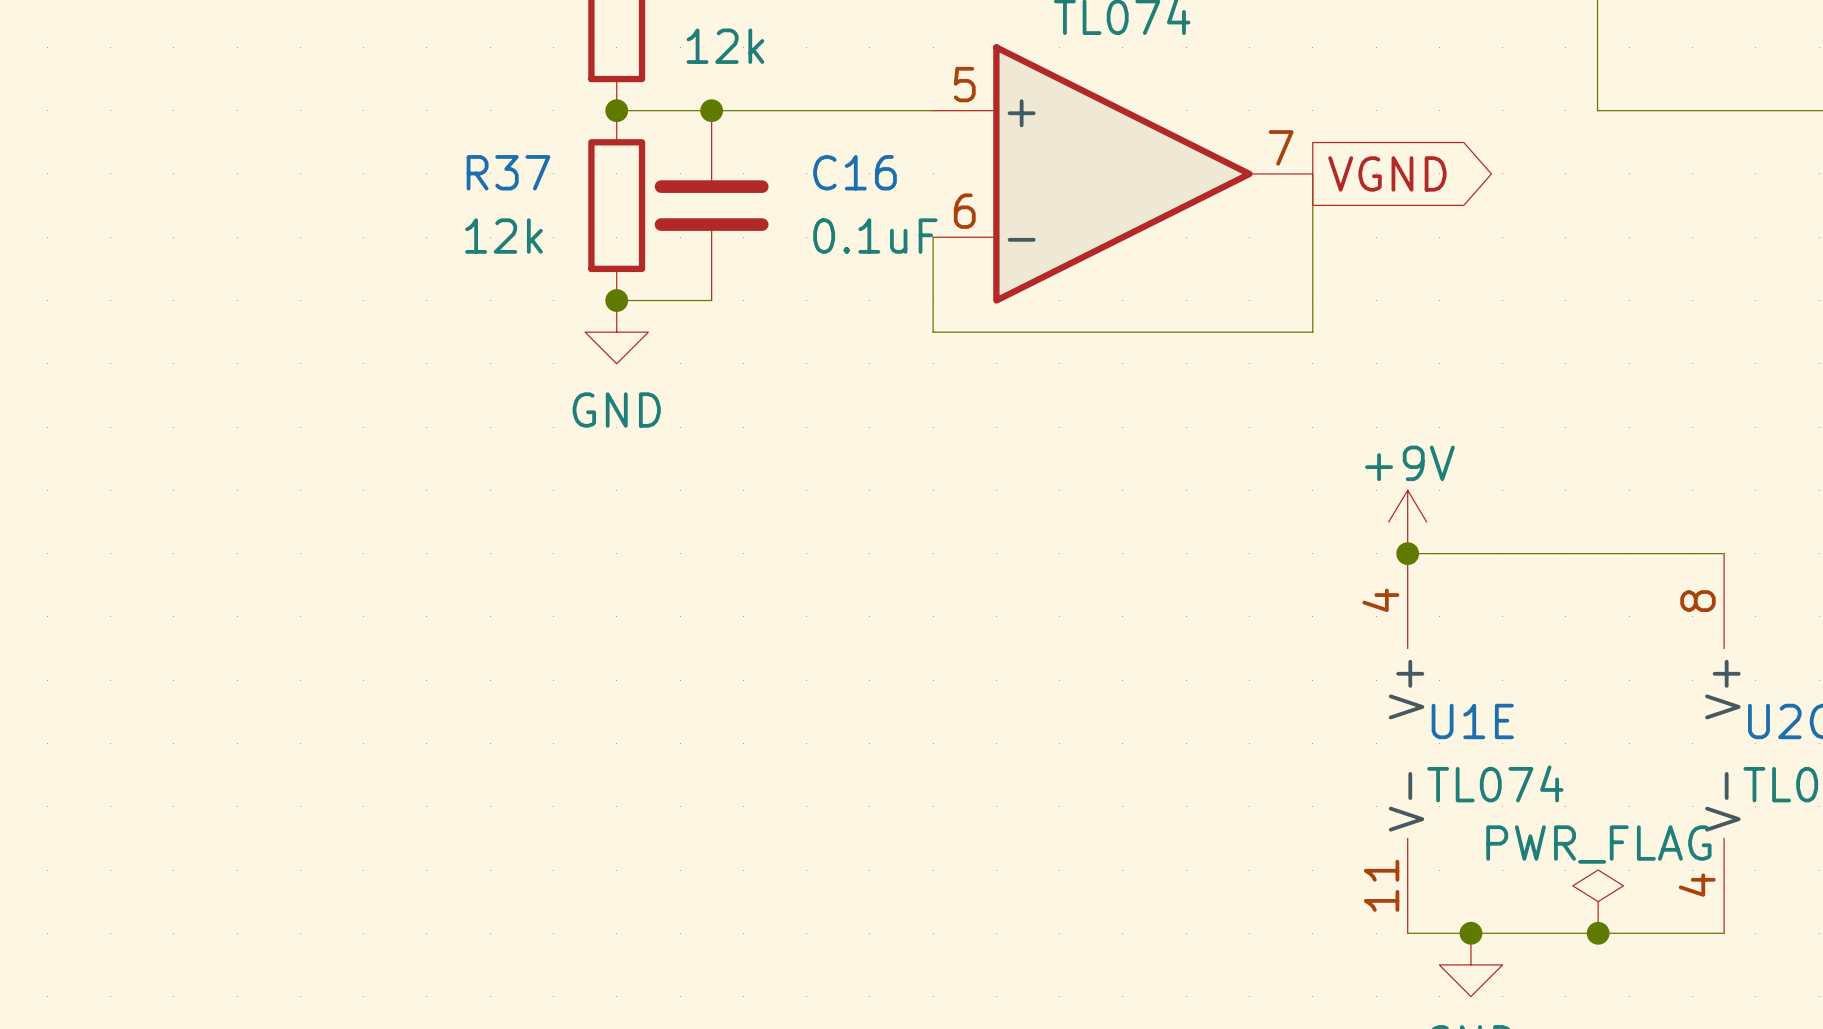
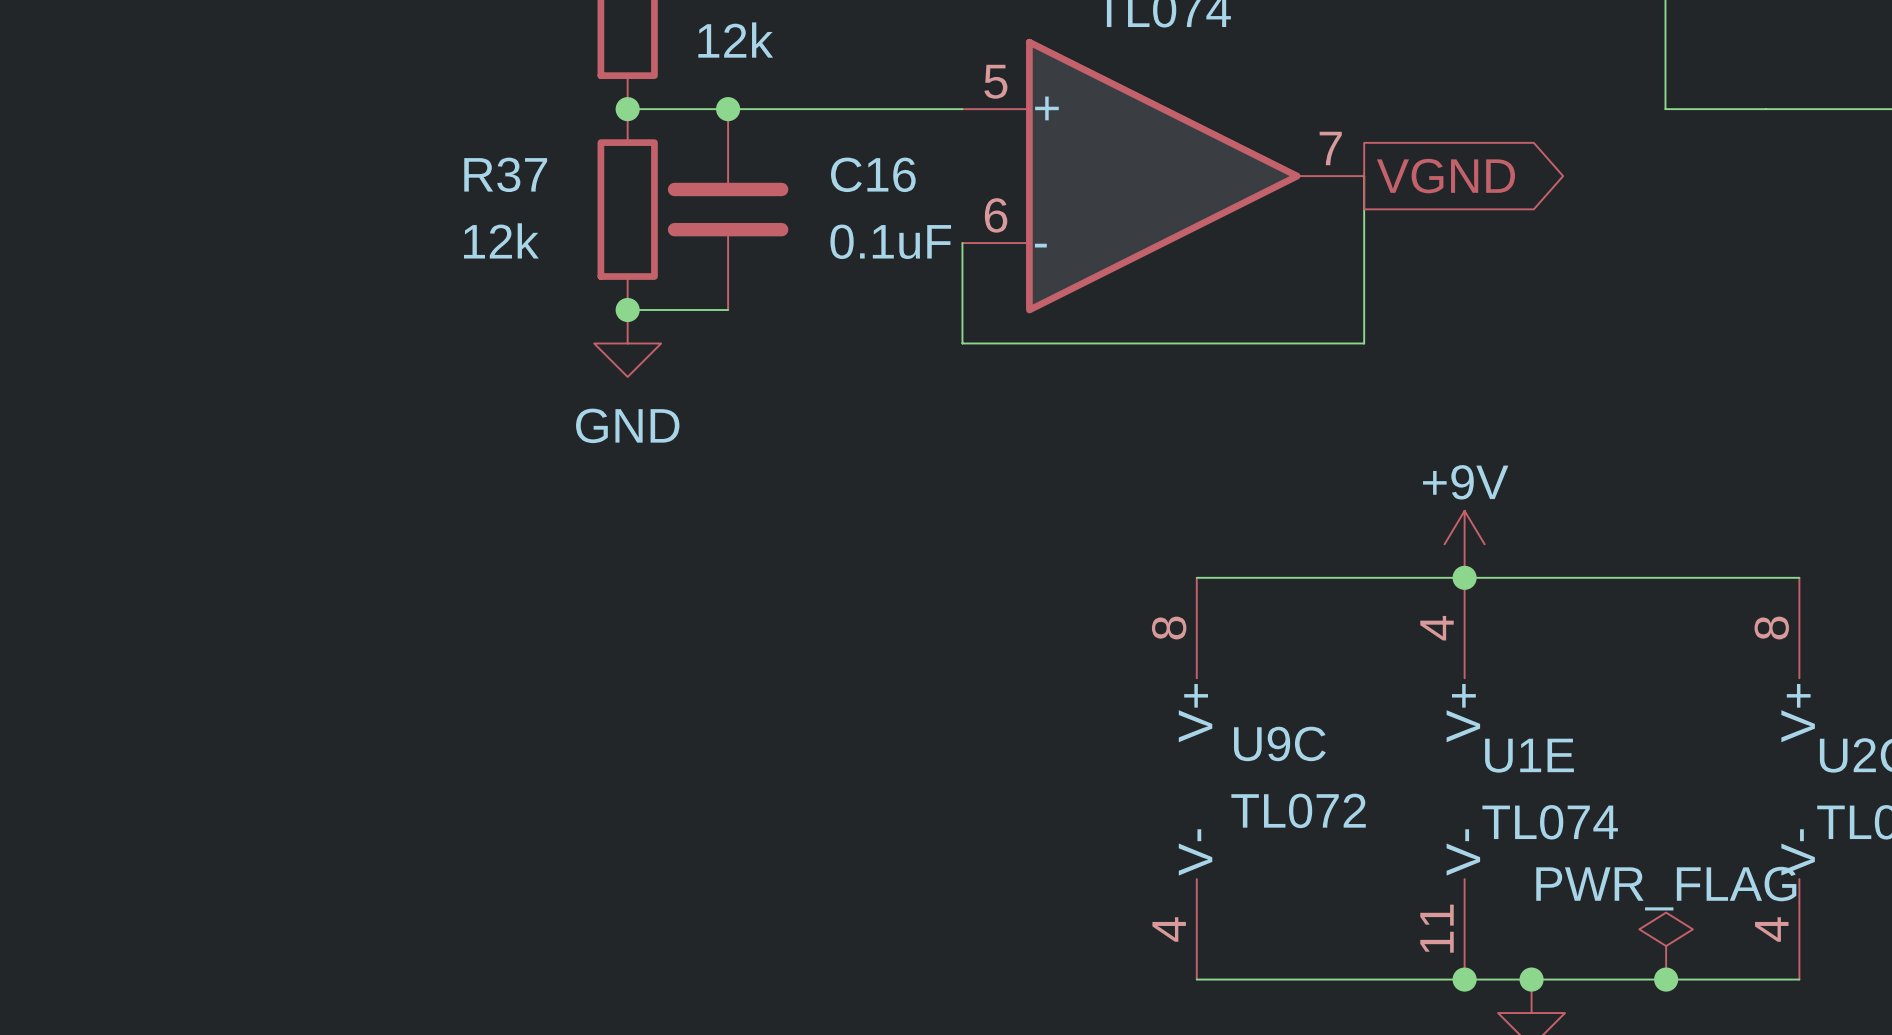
wire: none -> (1196, 577) (1464, 577)
U9C: none -> TL072 (1196, 778)
wire: none -> (1196, 979) (1464, 979)
junction: none -> (1464, 979)

